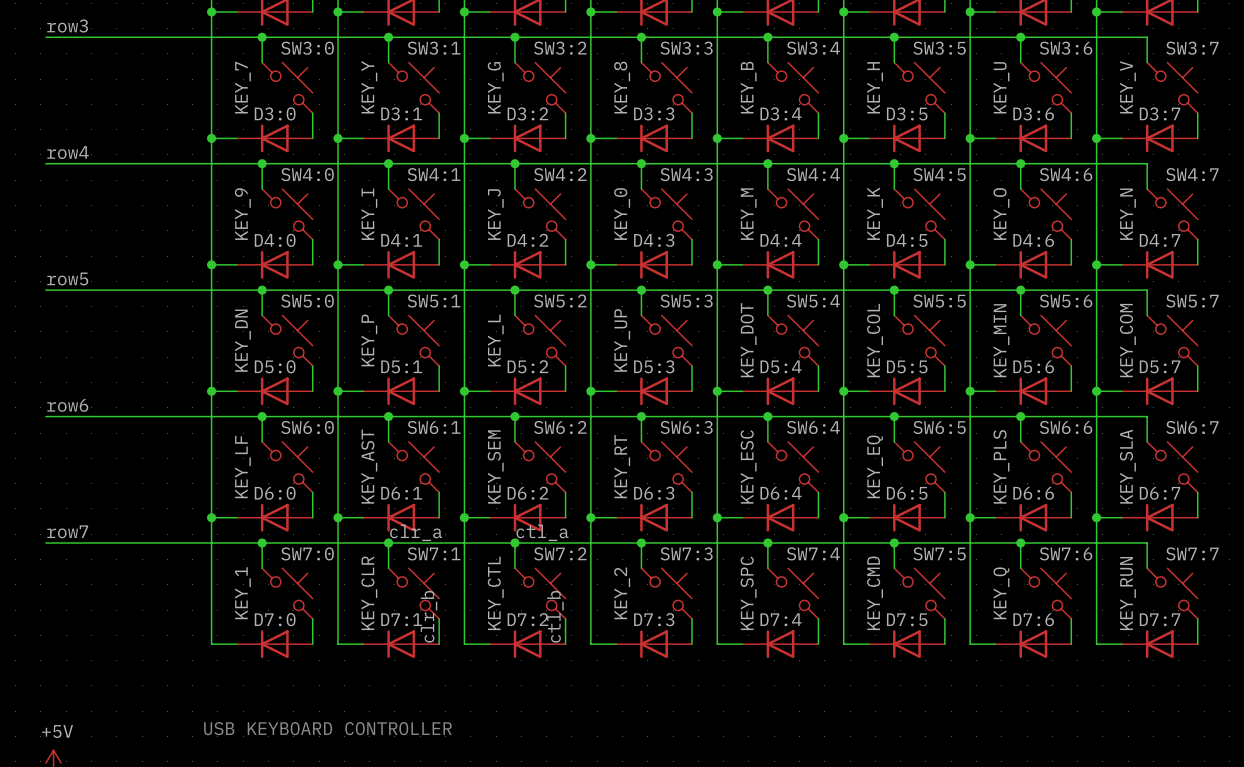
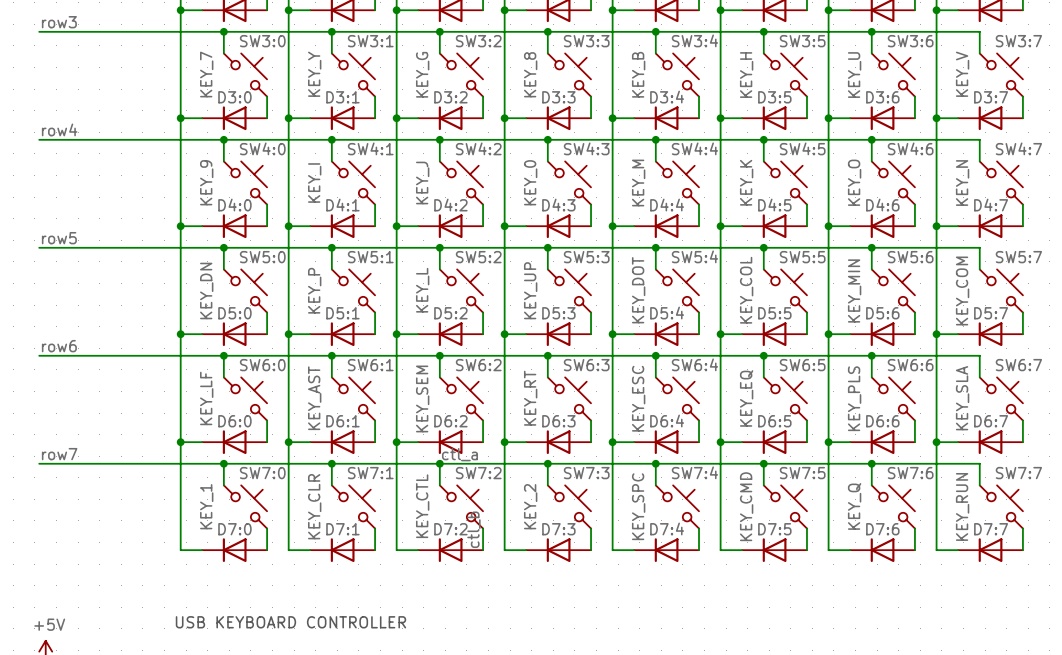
label: clr_a (416, 532) -> none
label: clr_b (429, 616) -> none

